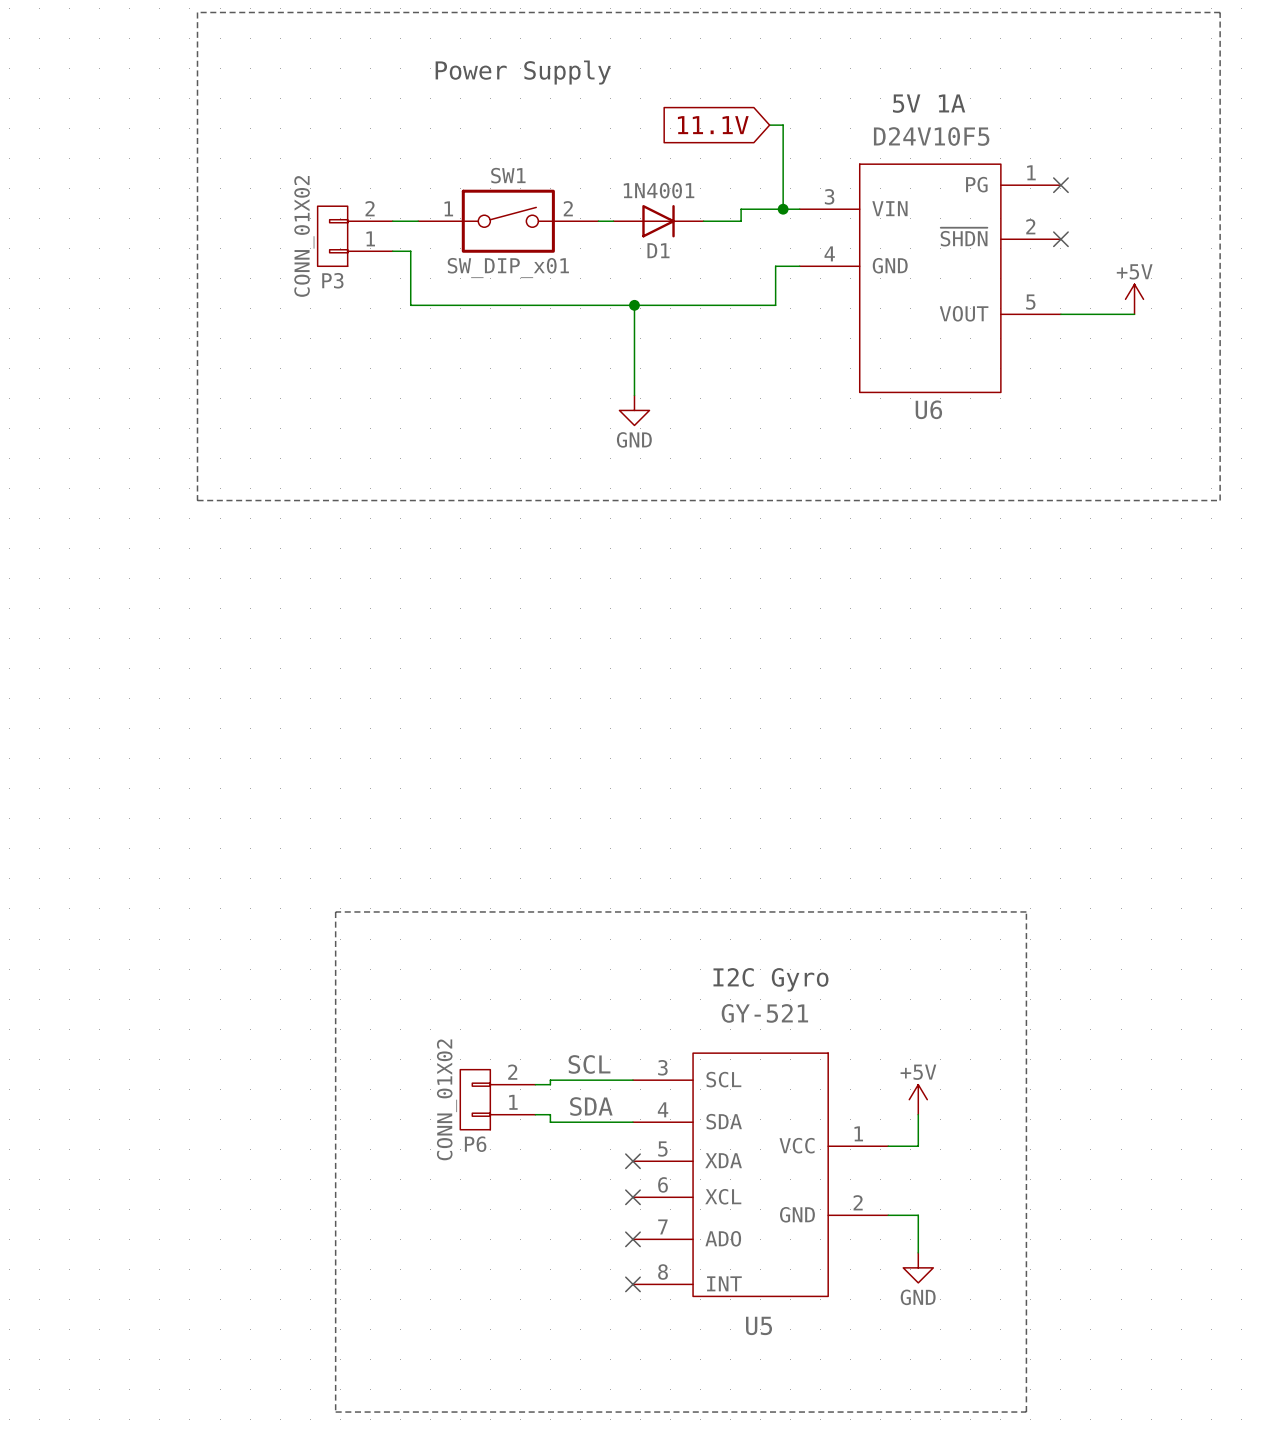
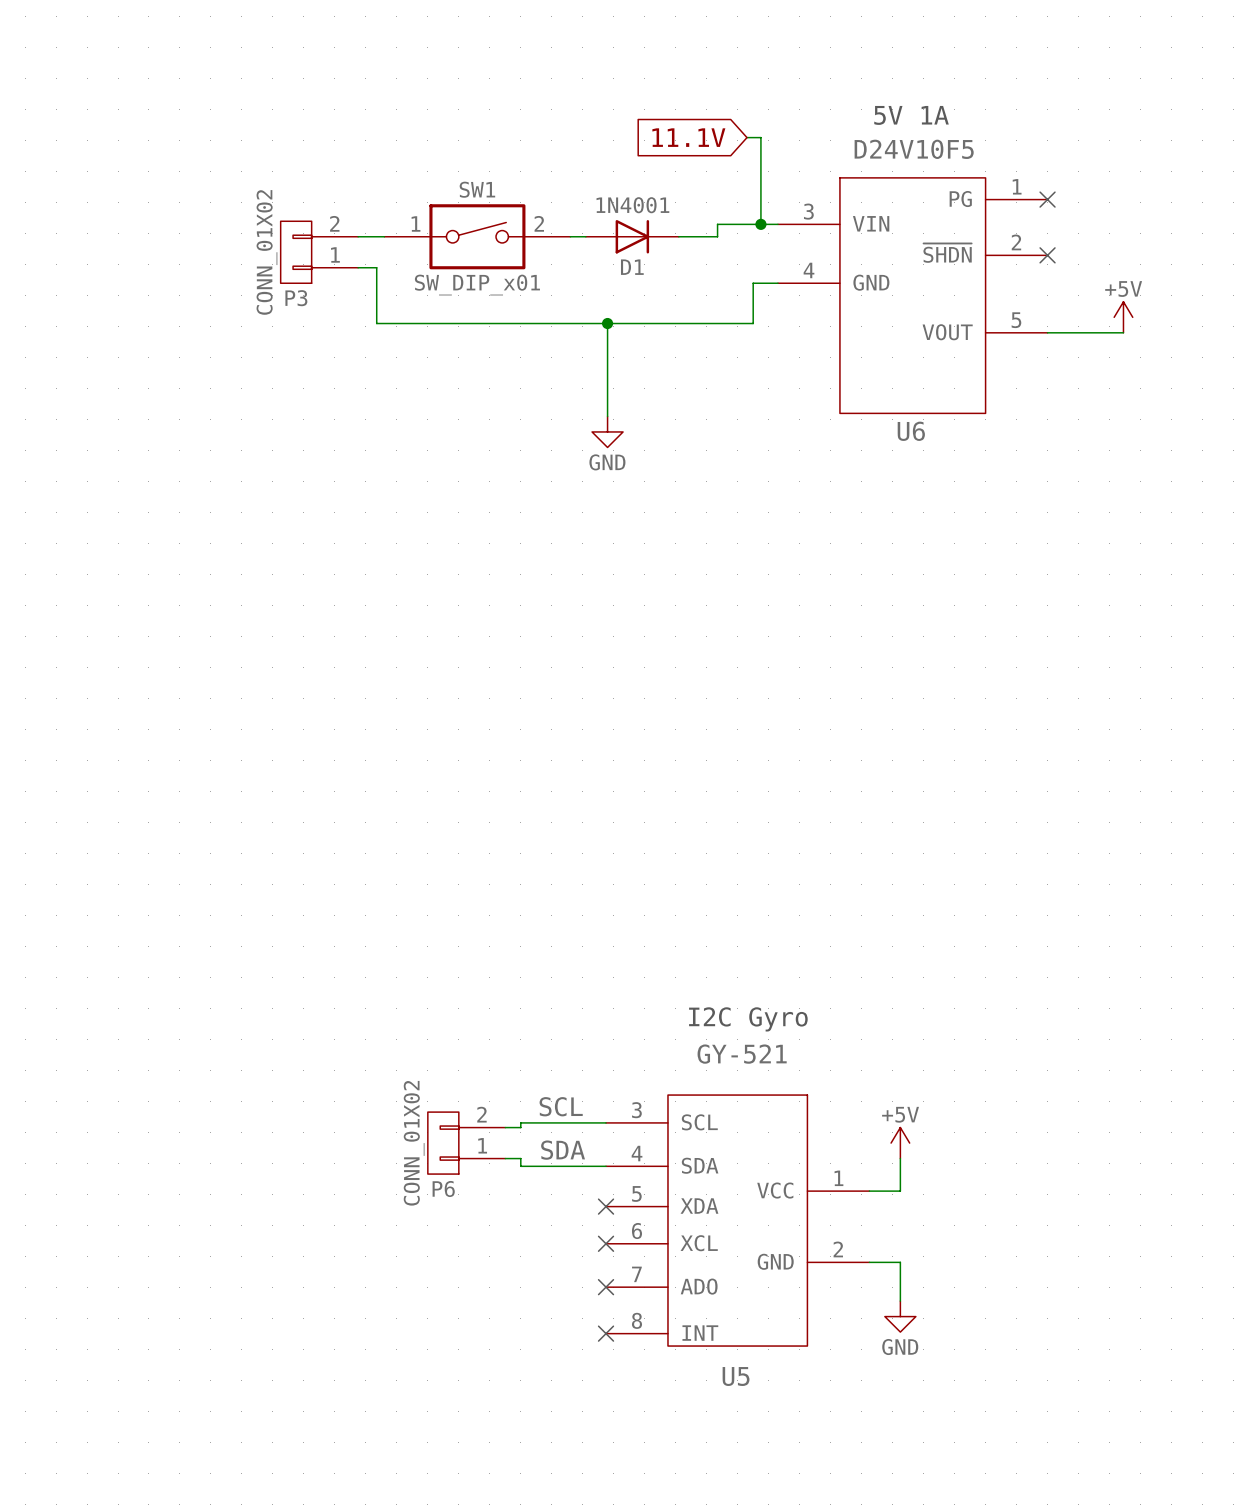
line: (197, 12) (197, 500) (1220, 500) (1220, 12) (197, 12) -> none
text: Power Supply (523, 72) -> none
line: (335, 911) (335, 1412) (1026, 1412) (1026, 911) (335, 911) -> none

